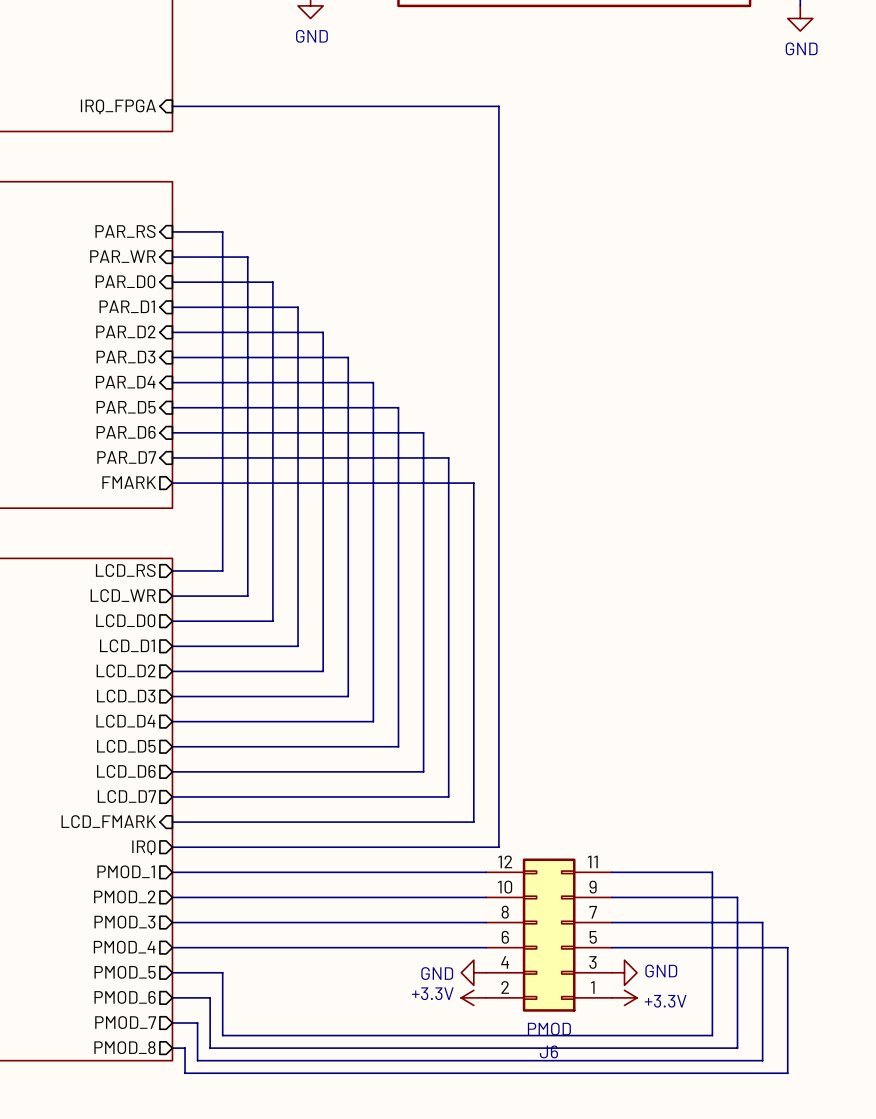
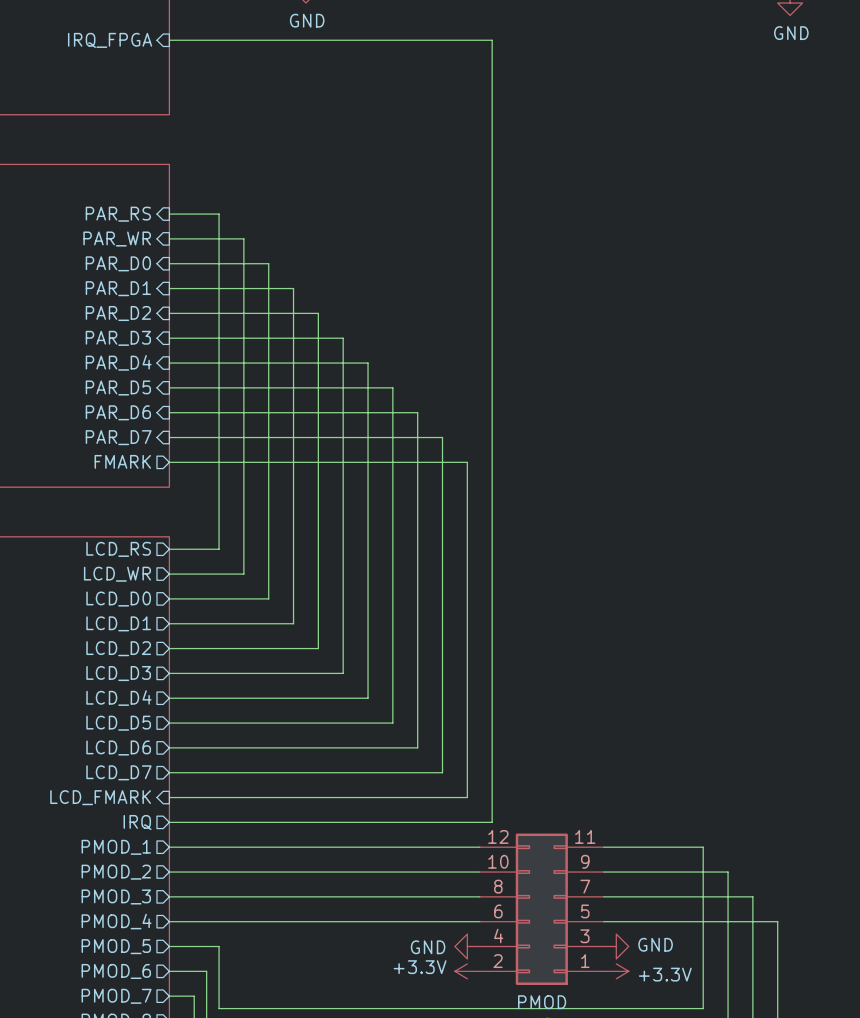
sheet pin position: IRQ_FPGA (118, 106) -> IRQ_FPGA (110, 40)
wire: (172, 106) (498, 106) -> (169, 40) (492, 40) (492, 89)

